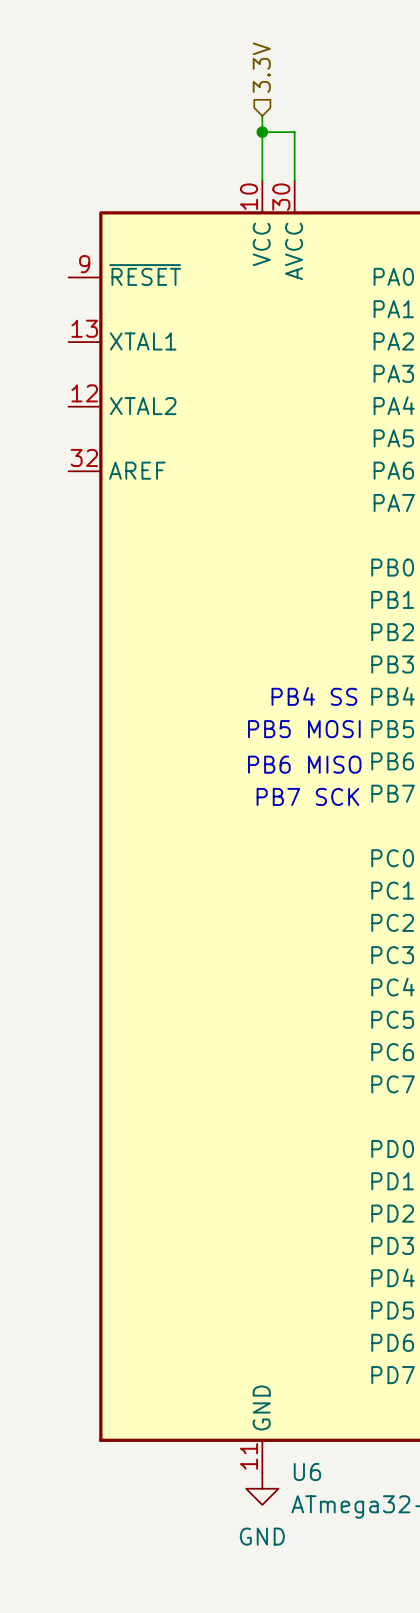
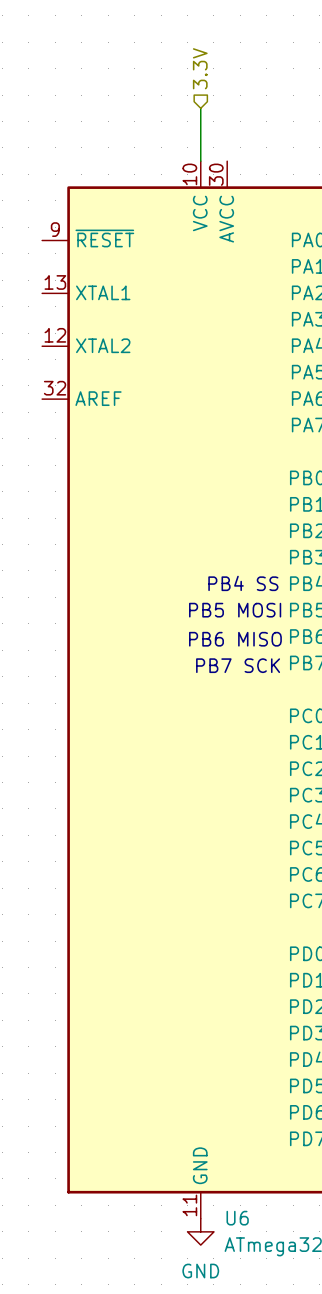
wire: (262, 132) (294, 132) (294, 180) -> none
junction: (262, 132) -> none

